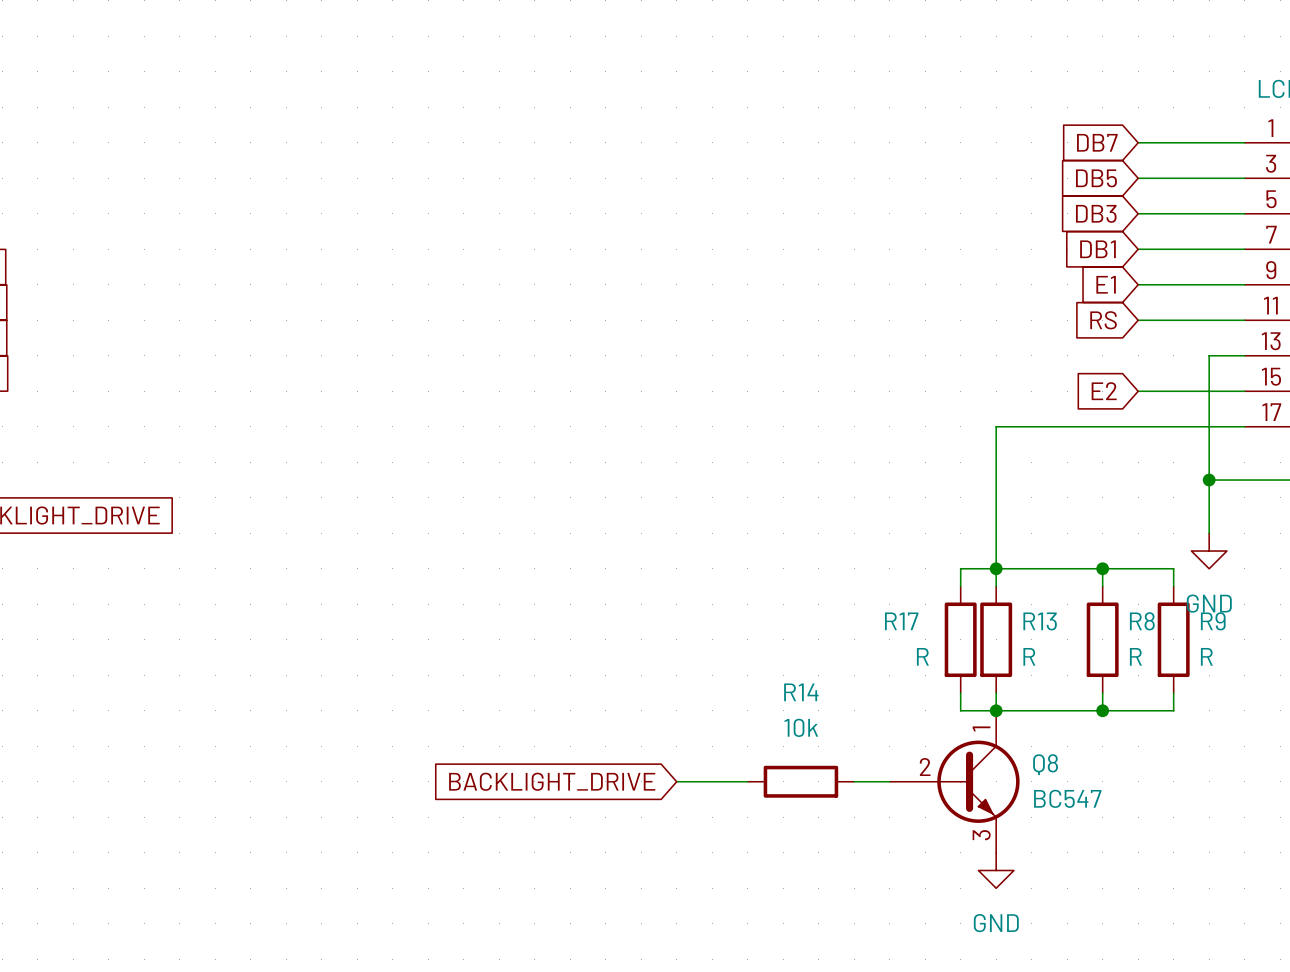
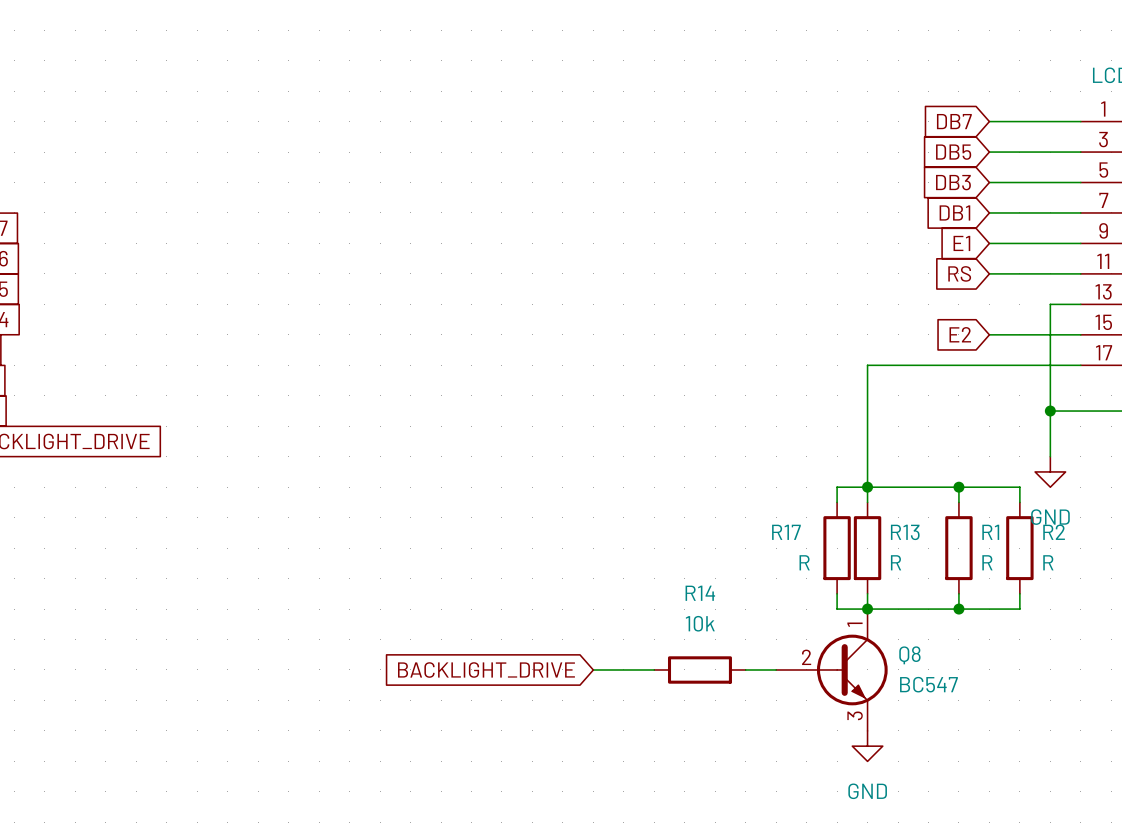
R8 name: R8 (1142, 621) -> R1 (990, 532)
R9 name: R9 (1213, 621) -> R2 (1054, 532)

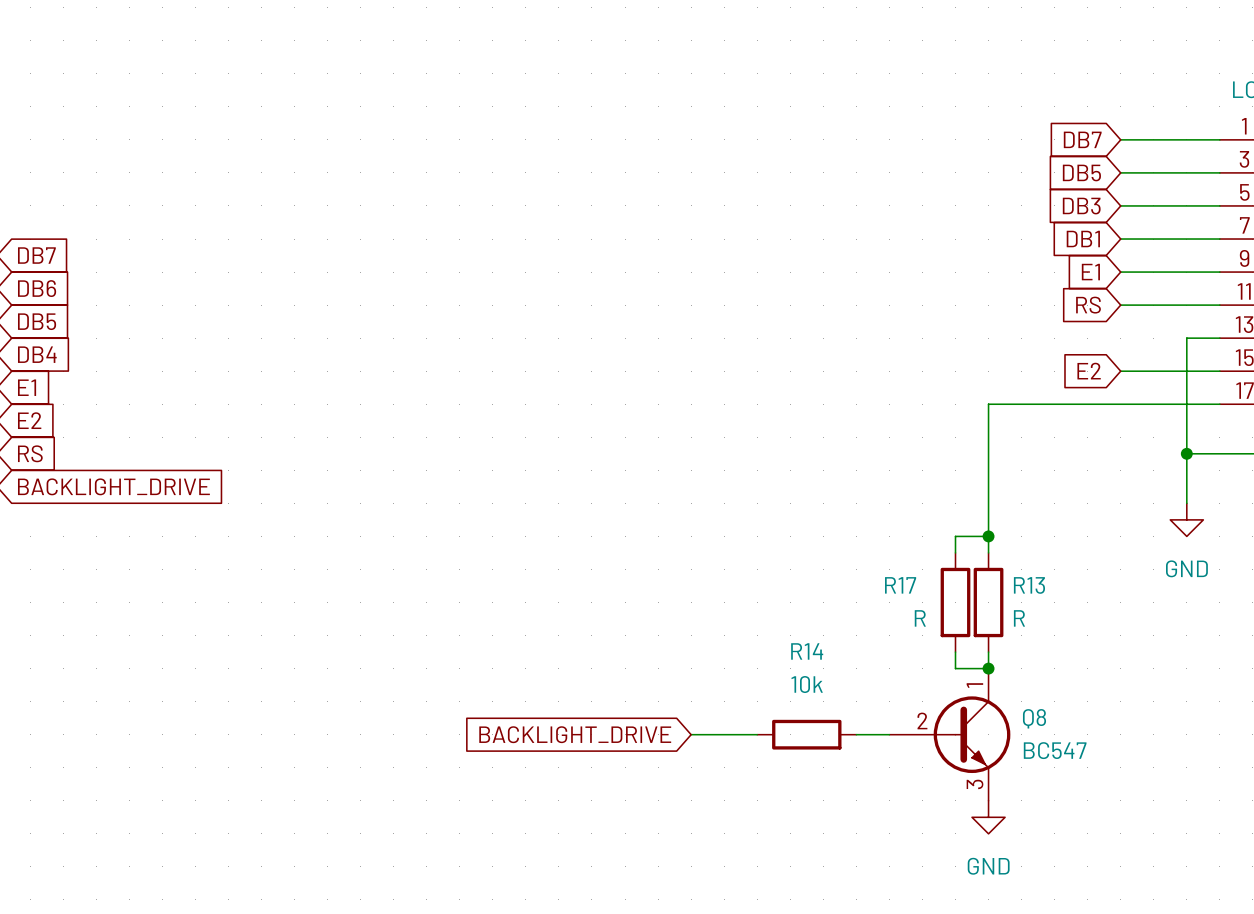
wire: (867, 487) (1019, 487) (1019, 502) -> none
wire: (958, 487) (958, 502) -> none
junction: (958, 487) -> none
R1: R (958, 548) -> none
R2: R (1019, 548) -> none
wire: (958, 593) (958, 609) -> none
wire: (1019, 593) (1019, 609) (867, 609) -> none
junction: (958, 609) -> none

